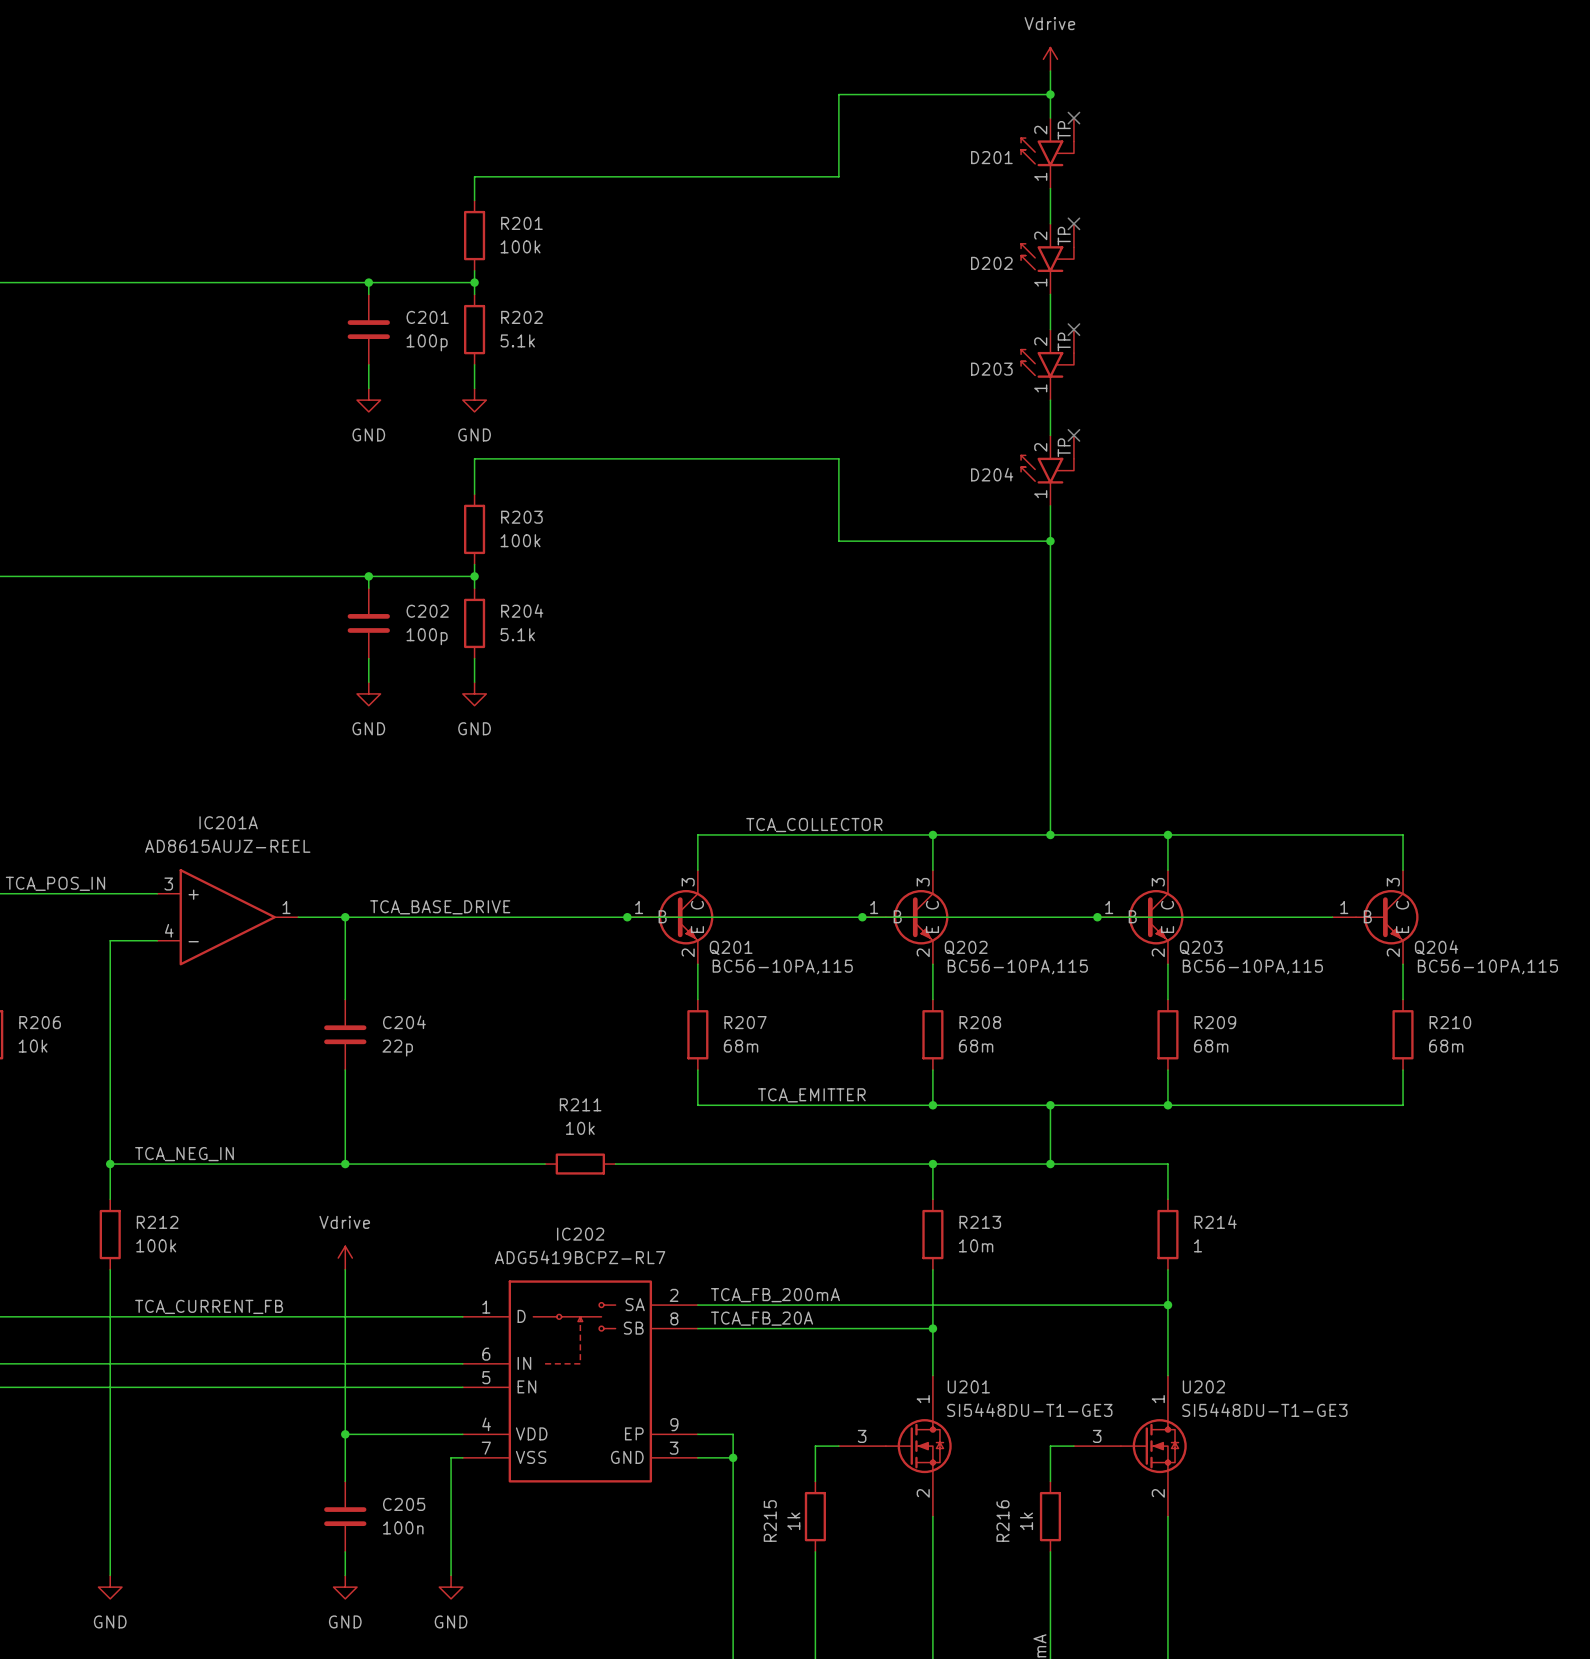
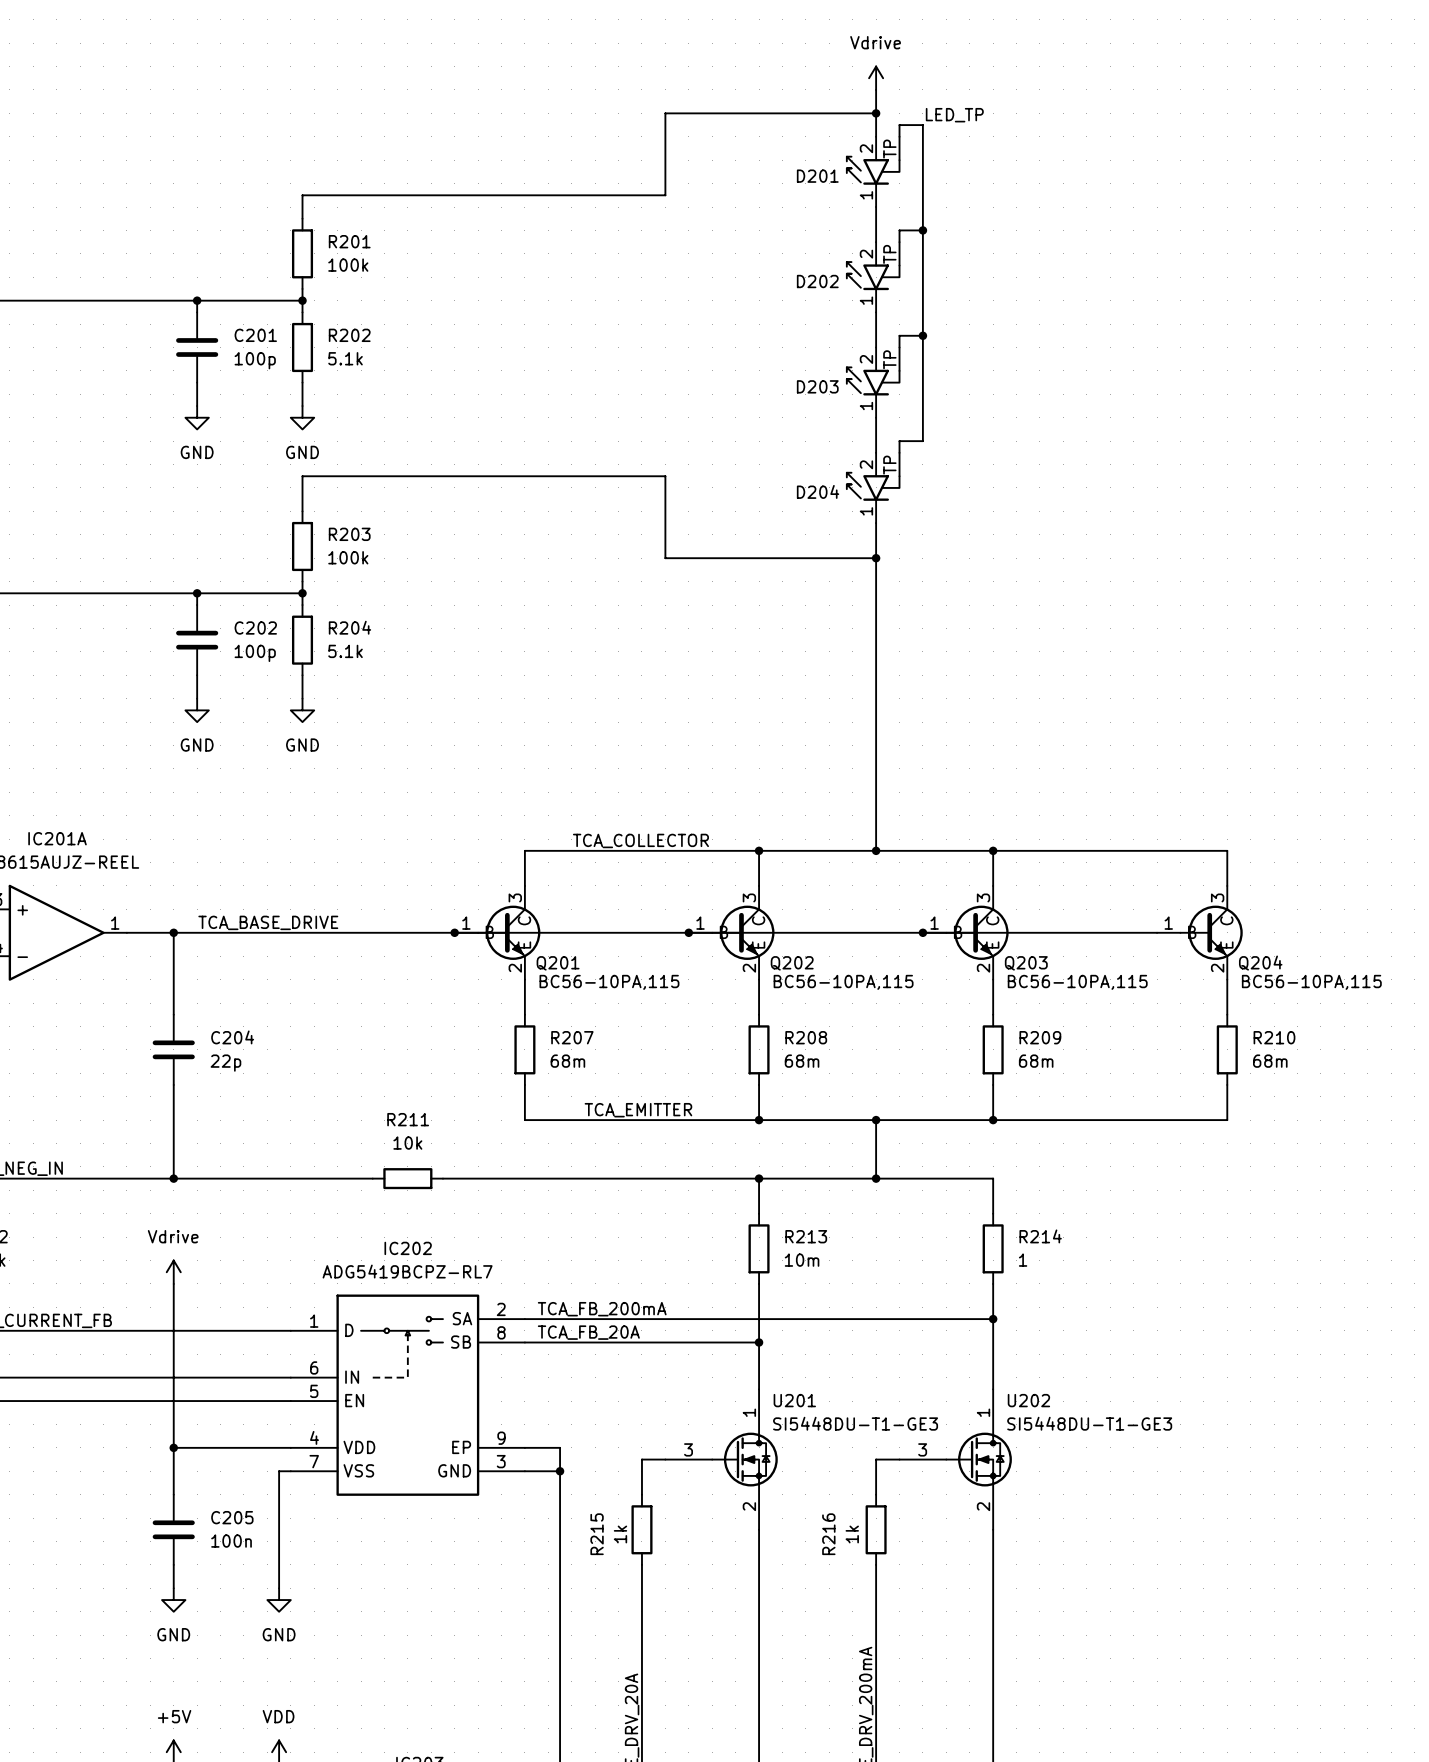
label: none -> LED_TP (954, 115)
wire: none -> (899, 136) (899, 125) (922, 125) (922, 441) (899, 441) (899, 452)
no-connect mark: (1073, 118) -> none
wire: none -> (922, 230) (899, 230) (899, 242)
junction: none -> (922, 230)
no-connect mark: (1073, 223) -> none
wire: none -> (922, 335) (899, 335) (899, 347)
junction: none -> (922, 335)
no-connect mark: (1073, 329) -> none
no-connect mark: (1073, 435) -> none

